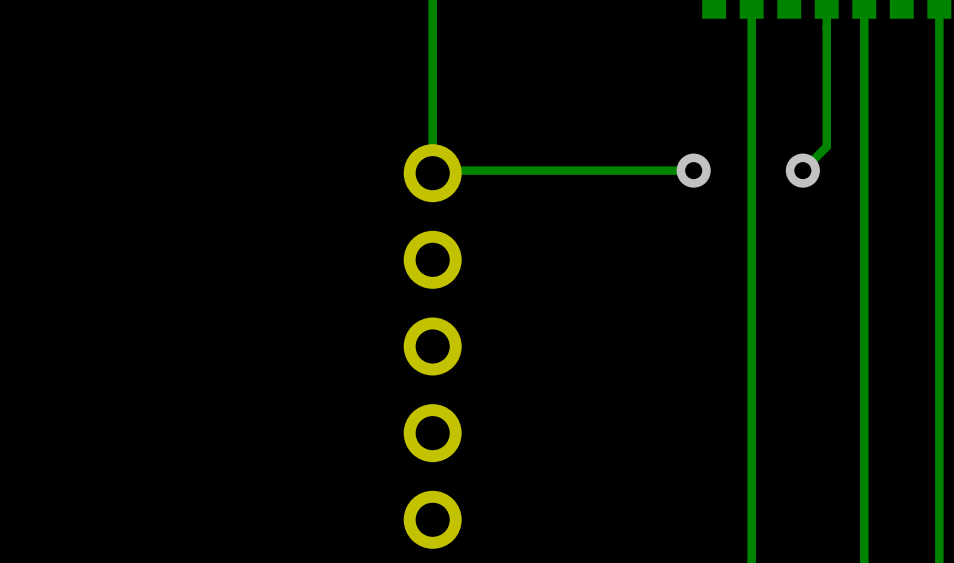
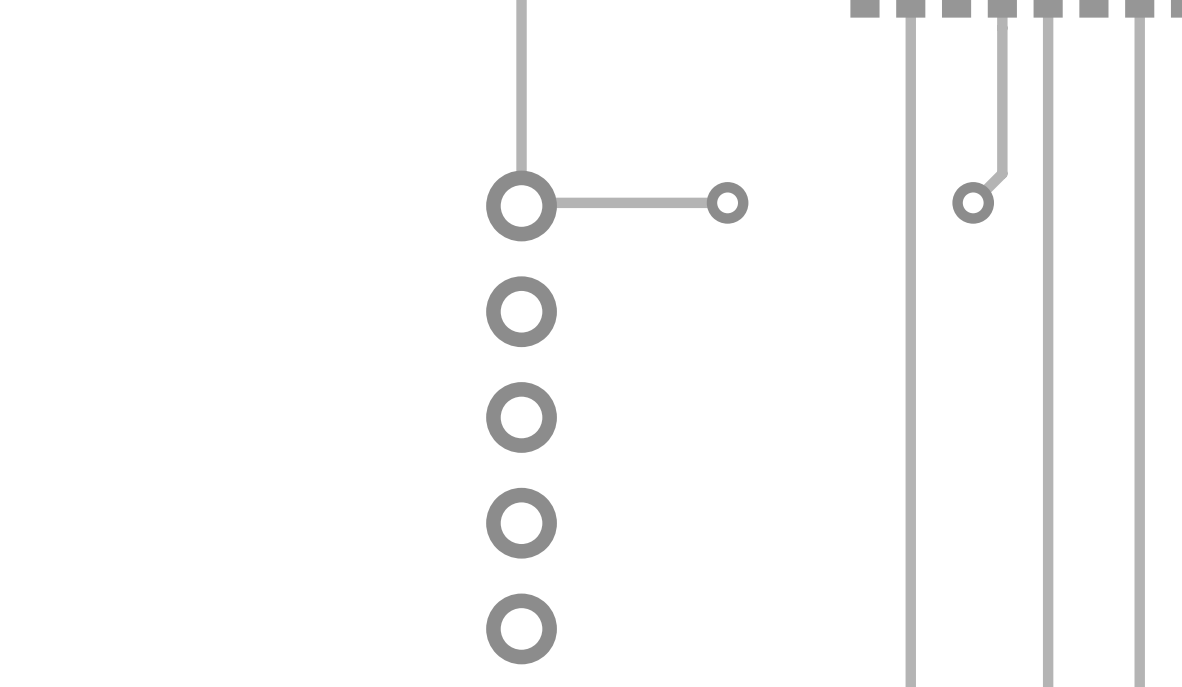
track: (693, 170) (601, 170) -> none
via position: (693, 170) -> (727, 202)

